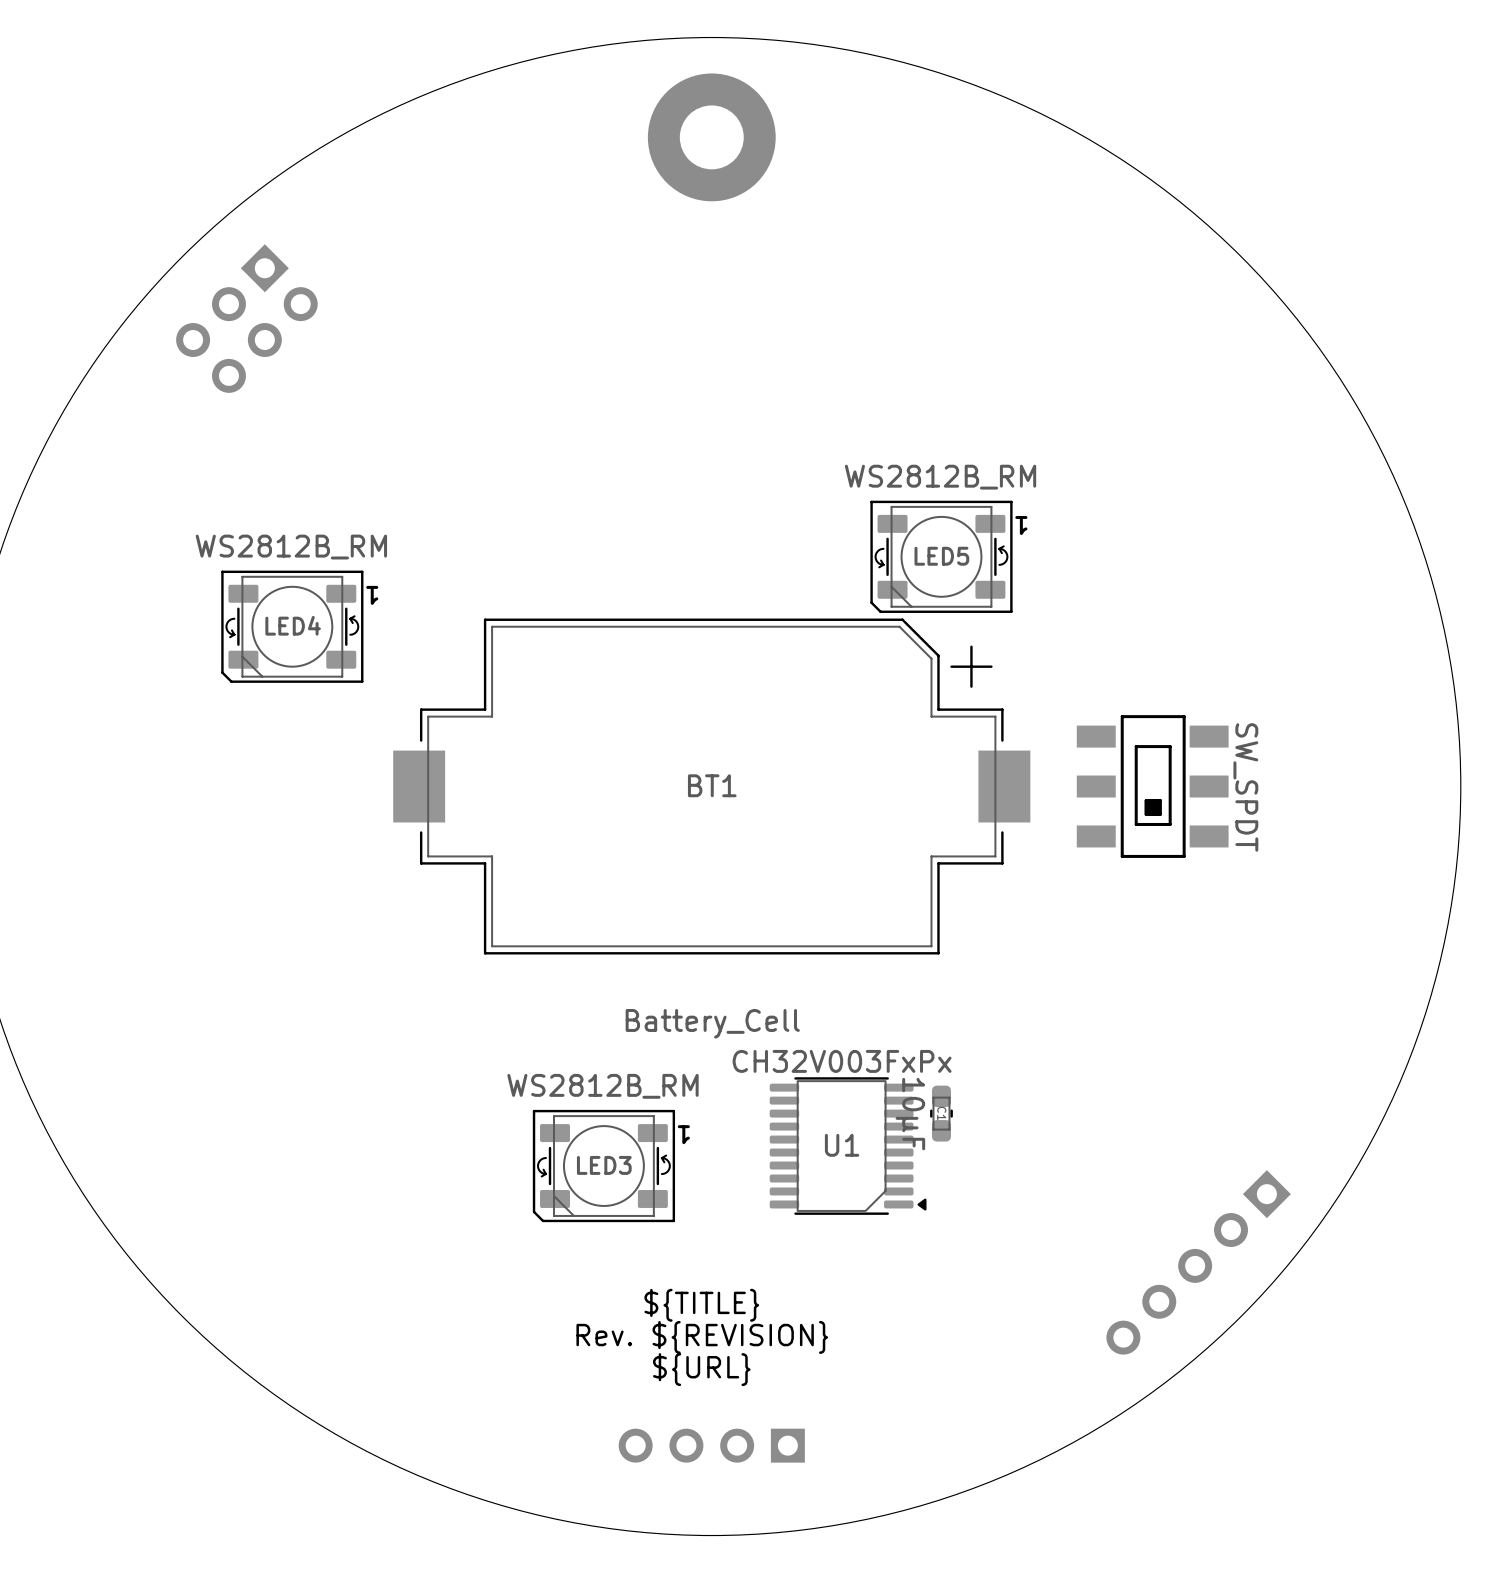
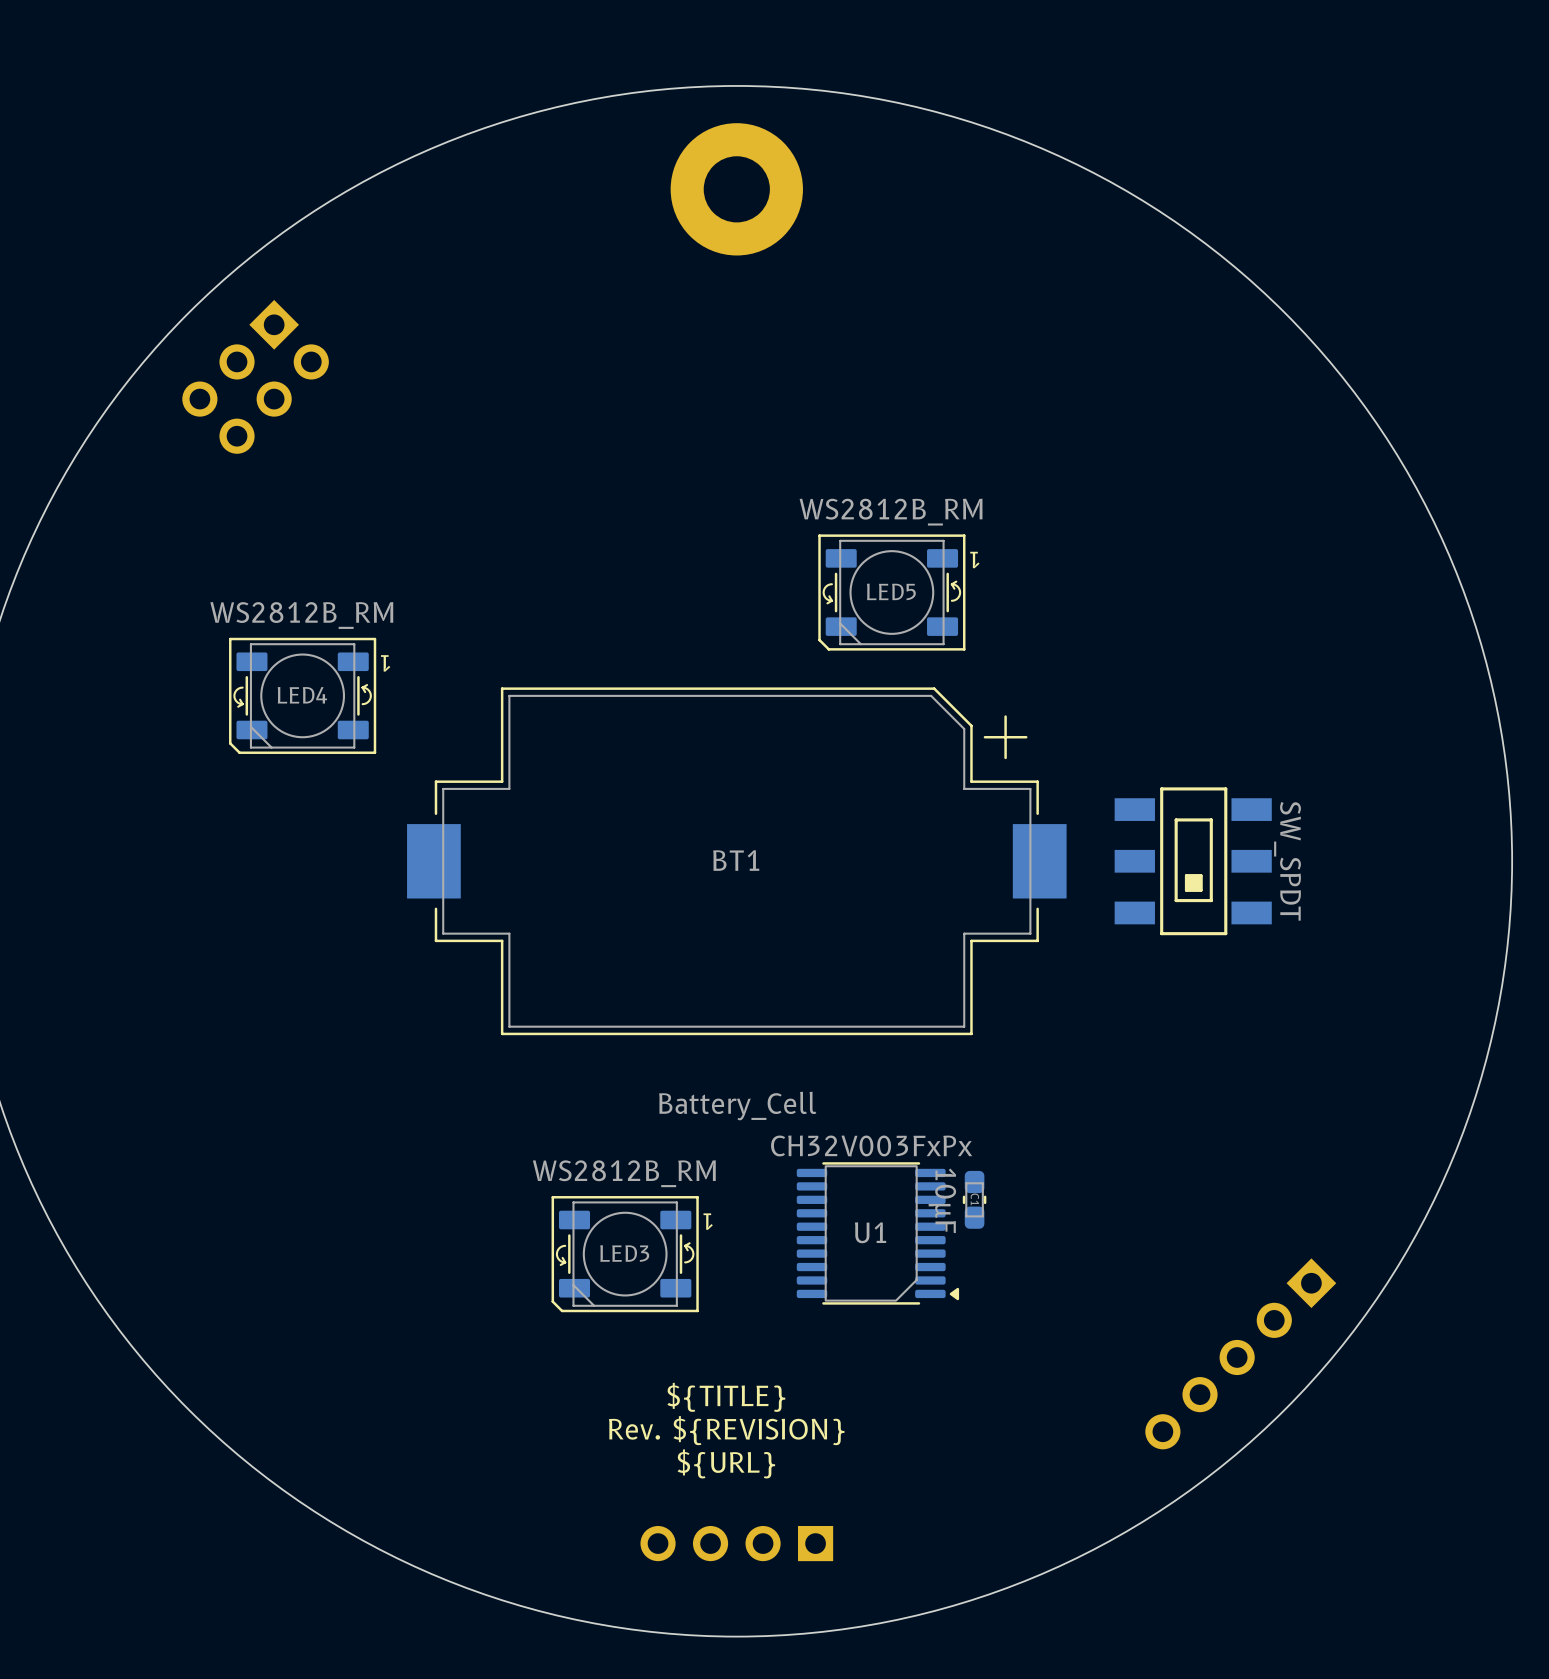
LED5 position: (941, 556) -> (891, 592)

